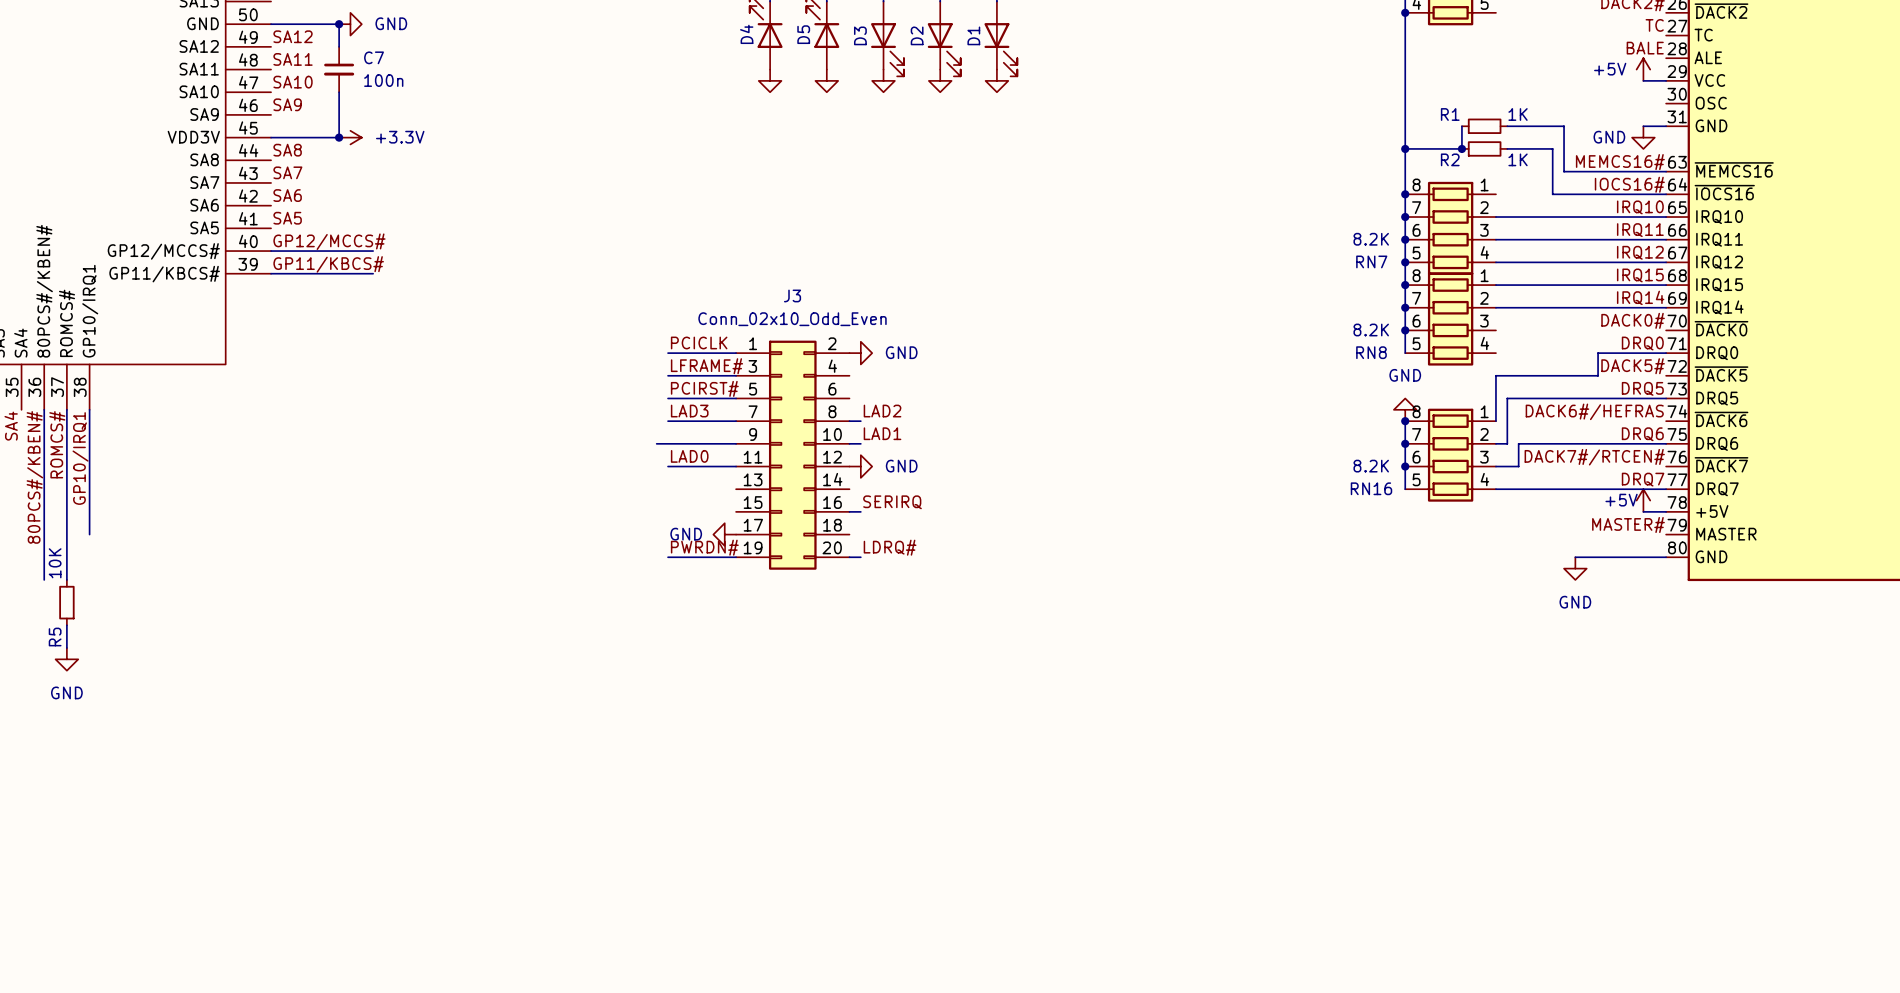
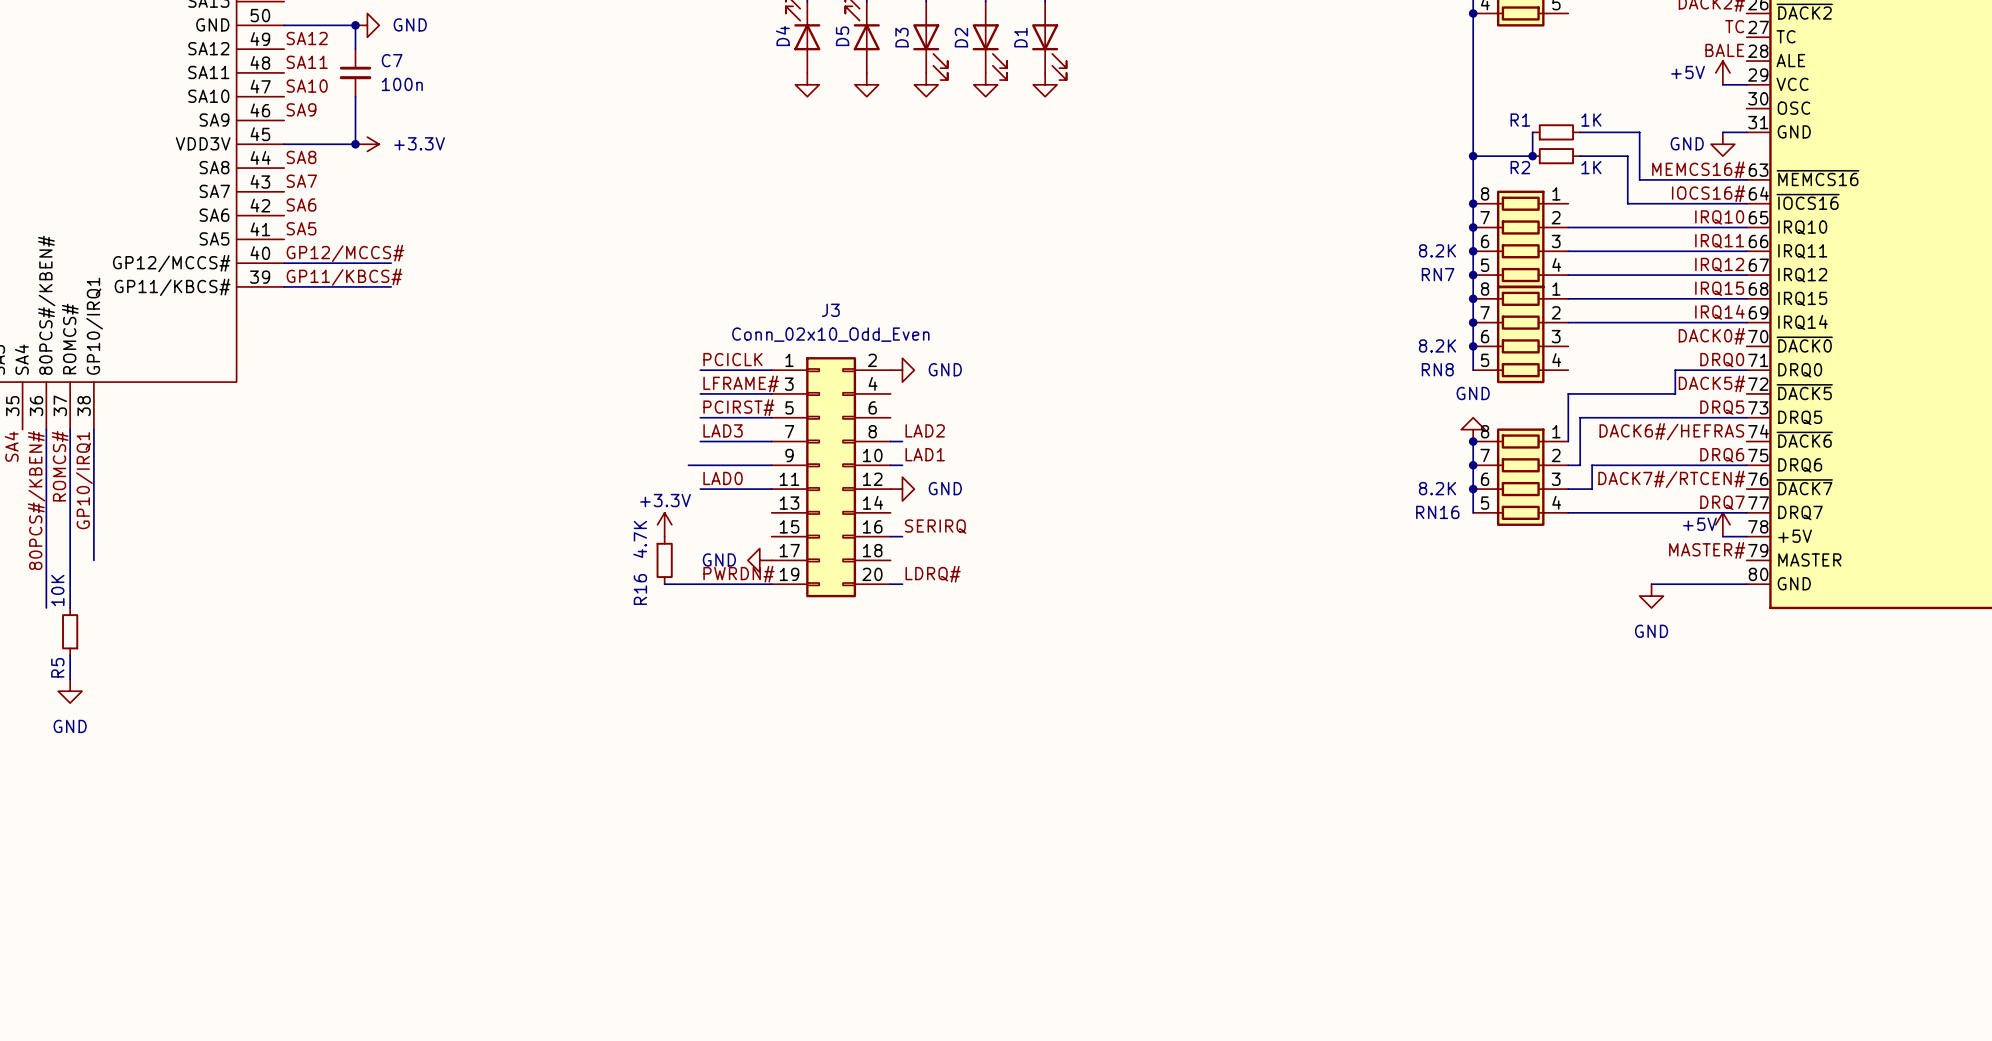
power symbol: none -> +3.3V (664, 524)
R16: none -> 4.7K (664, 560)
wire: none -> (664, 584) (700, 584)

